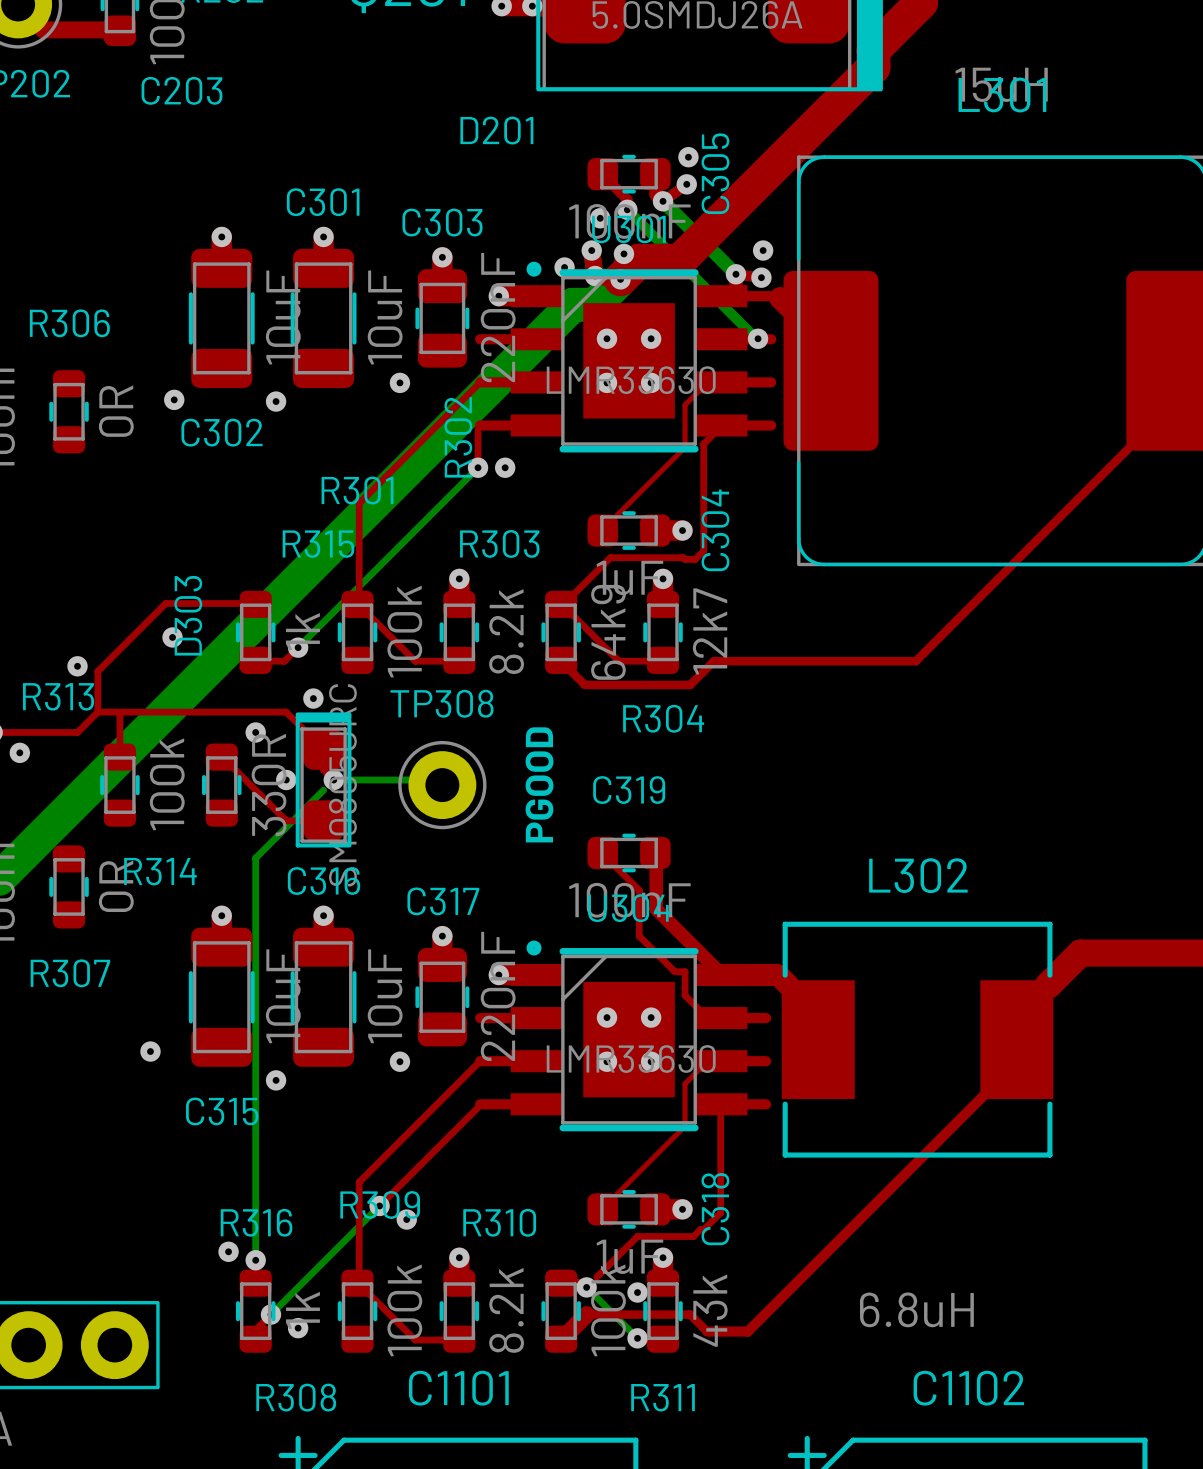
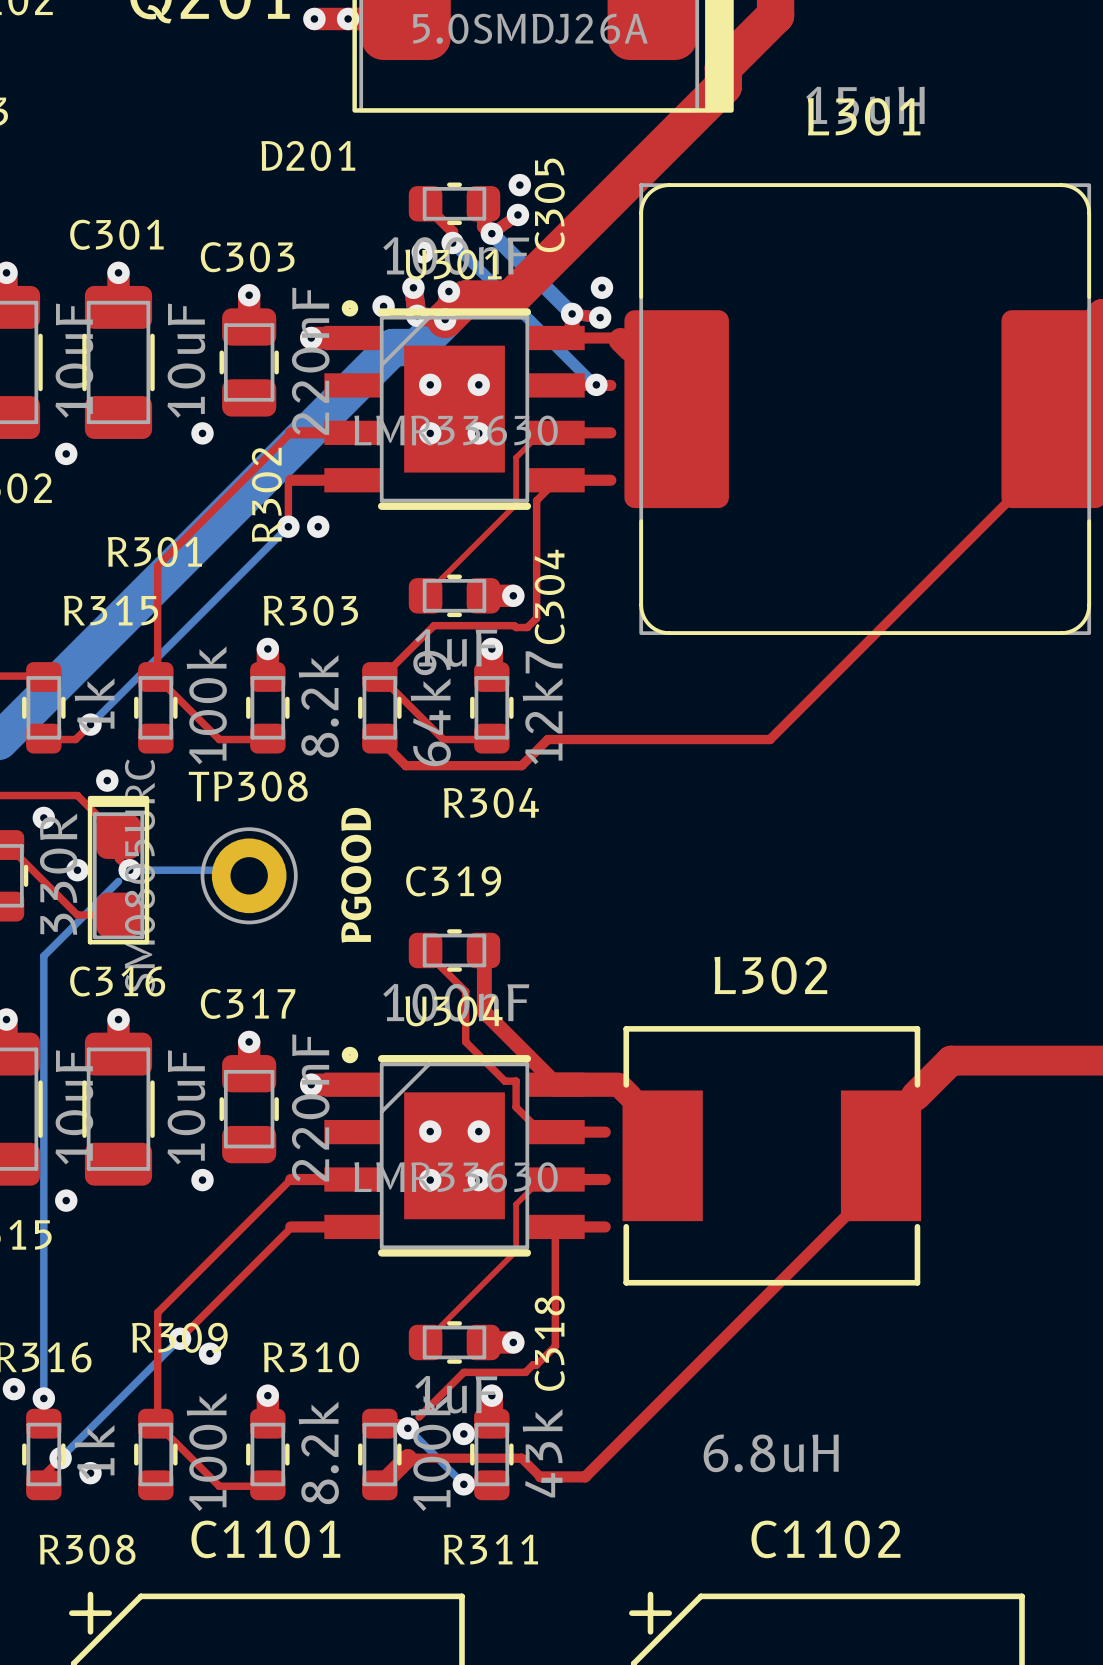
top track: (480, 339) (537, 339) -> none
top track: (480, 1018) (537, 1018) -> none

